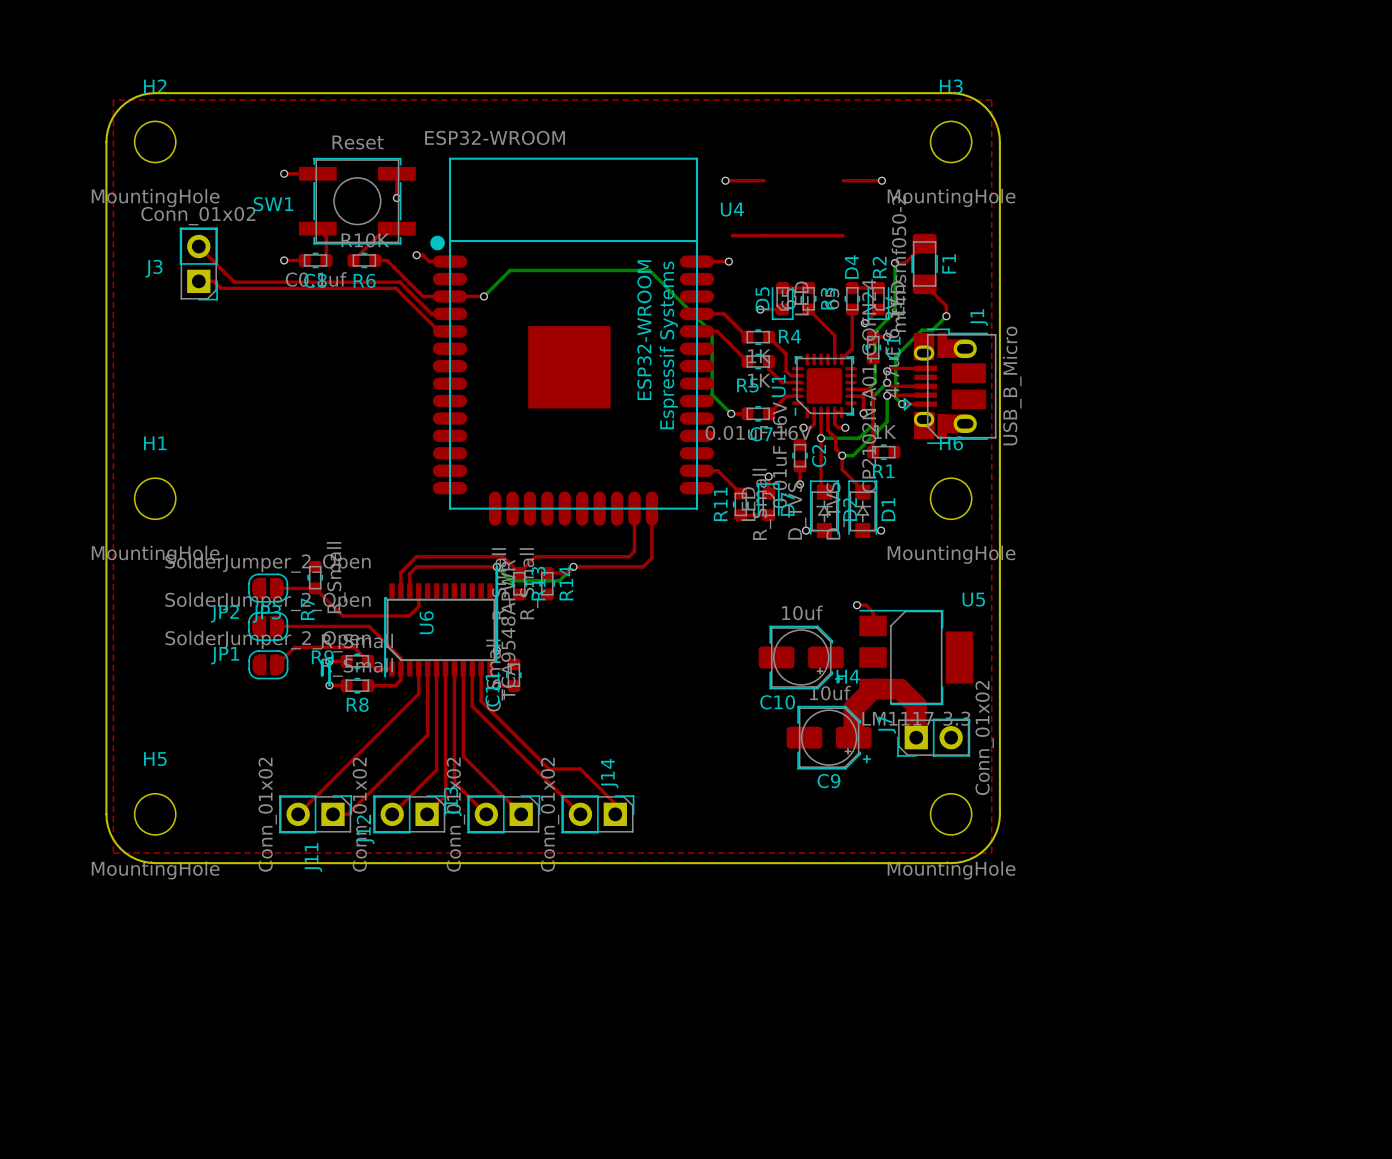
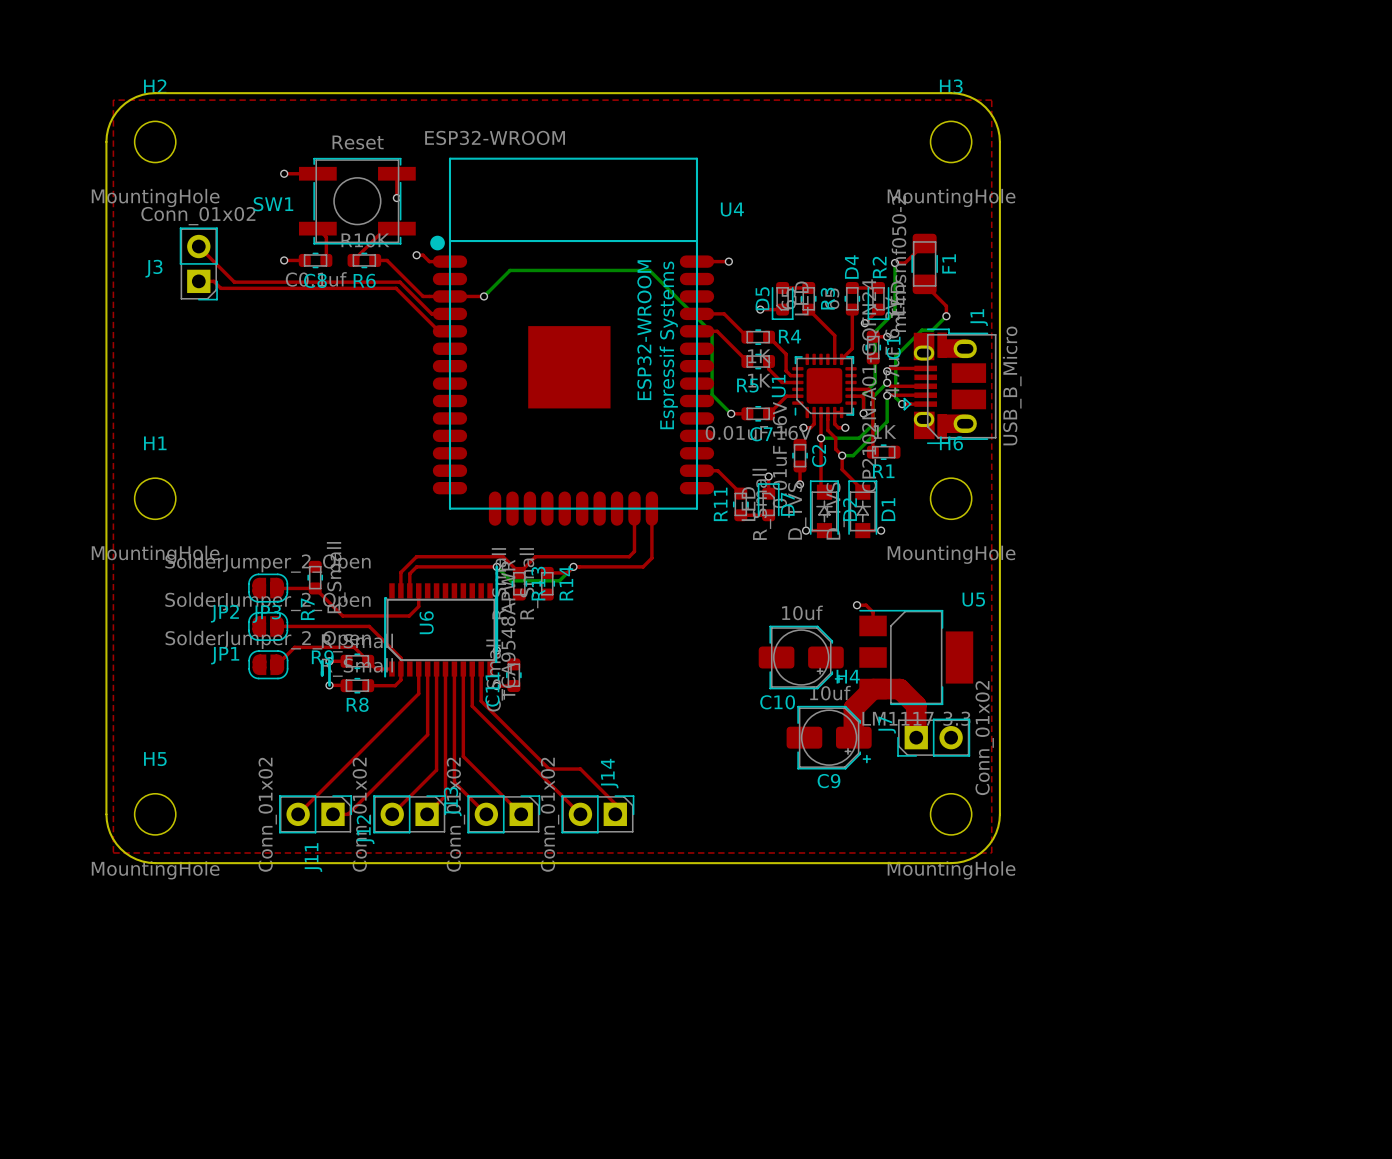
top track: (725, 180) (764, 180) -> none
via: (725, 180) -> none
top track: (843, 180) (881, 180) -> none
via: (881, 180) -> none
top track: (732, 235) (843, 235) -> none

